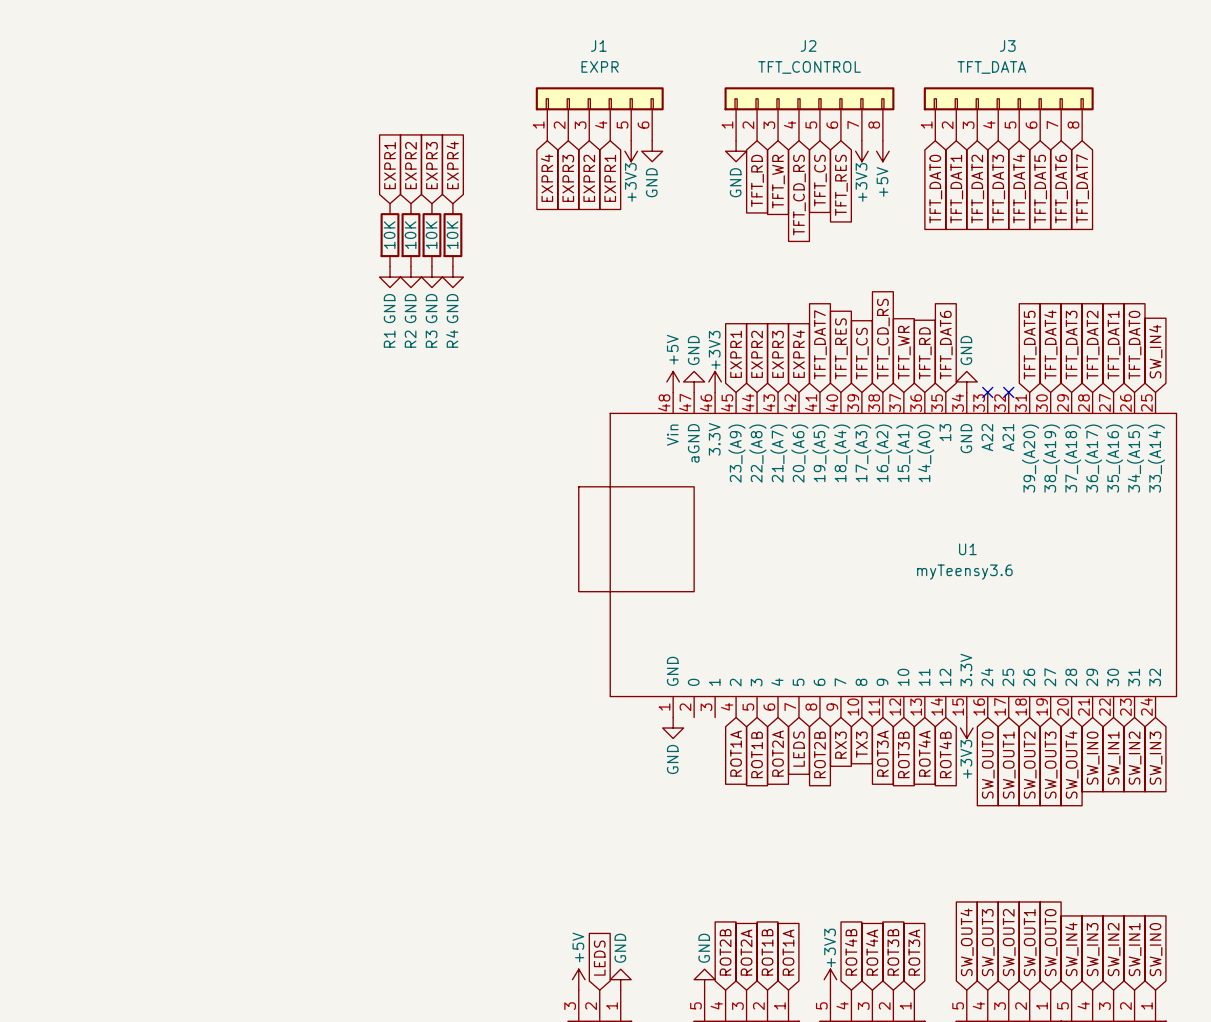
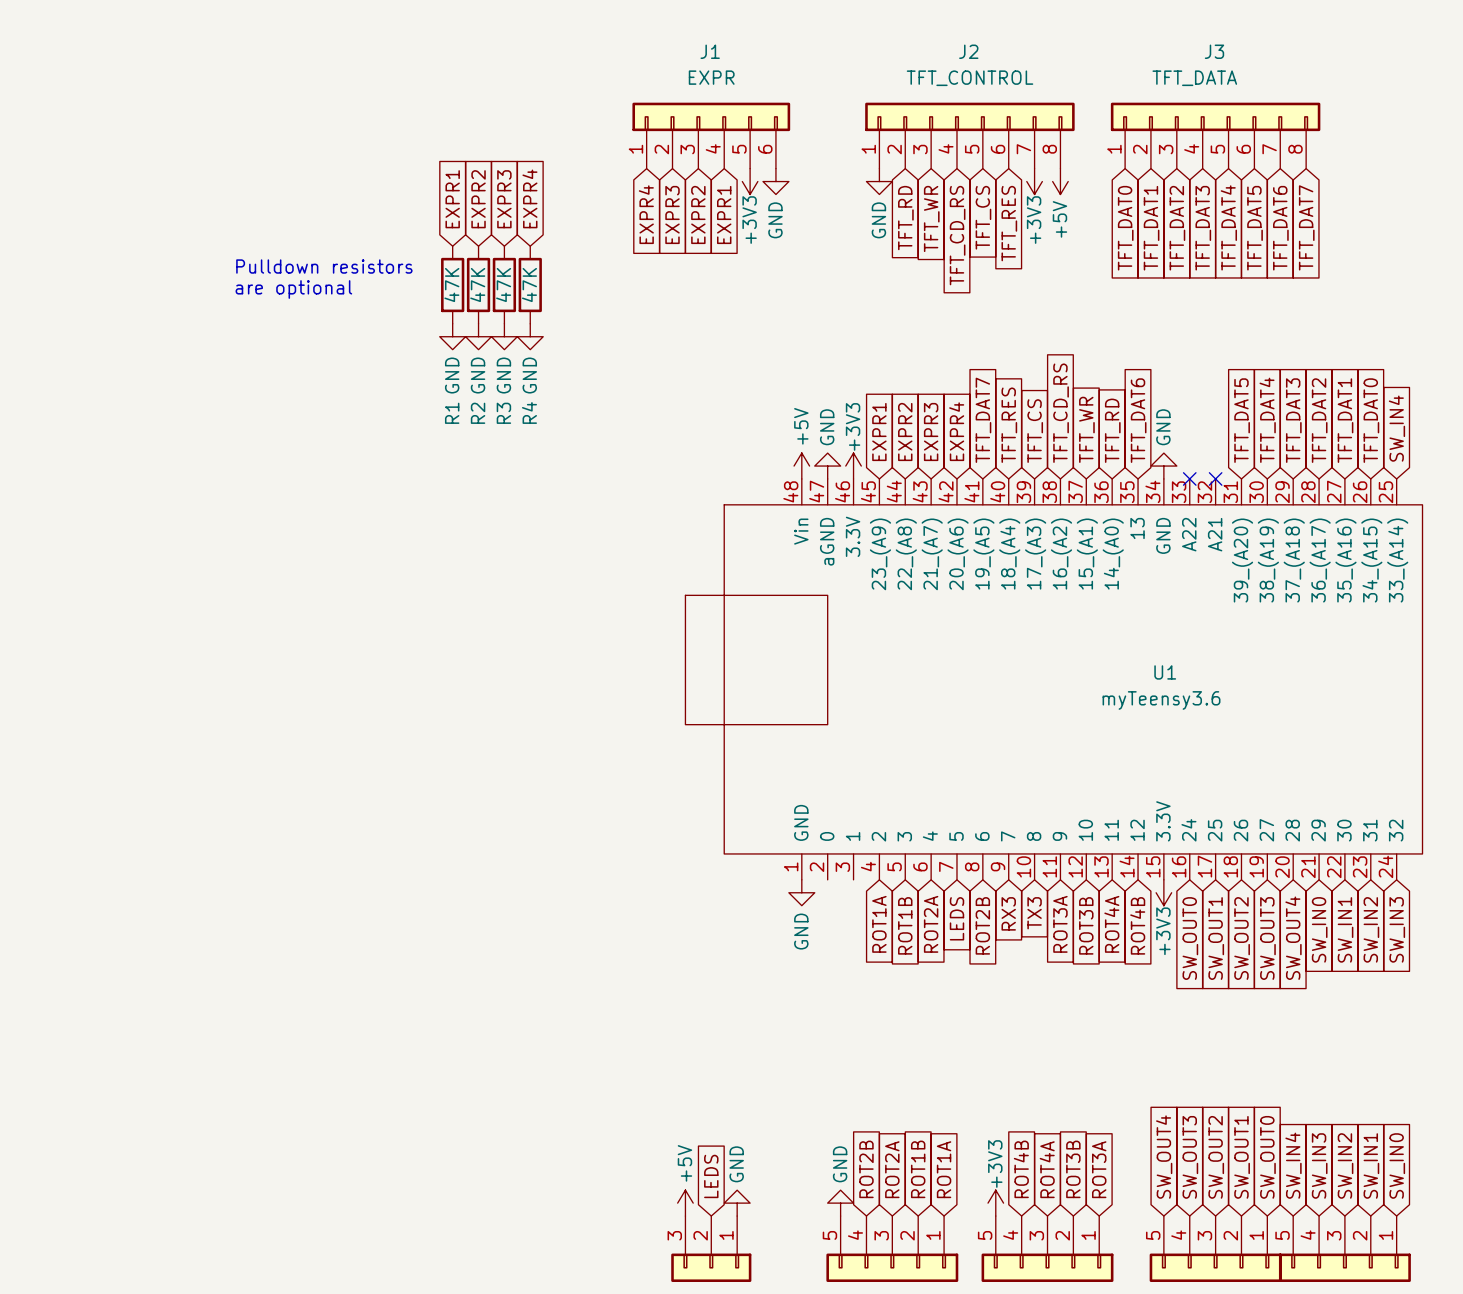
text: none -> Pulldown resistors (324, 266)
R1 value: 10K (389, 235) -> 47K (451, 285)
R2 value: 10K (410, 235) -> 47K (477, 285)
R3 value: 10K (431, 235) -> 47K (503, 285)
R4 value: 10K (452, 235) -> 47K (529, 285)
text: none -> are optional (293, 289)

